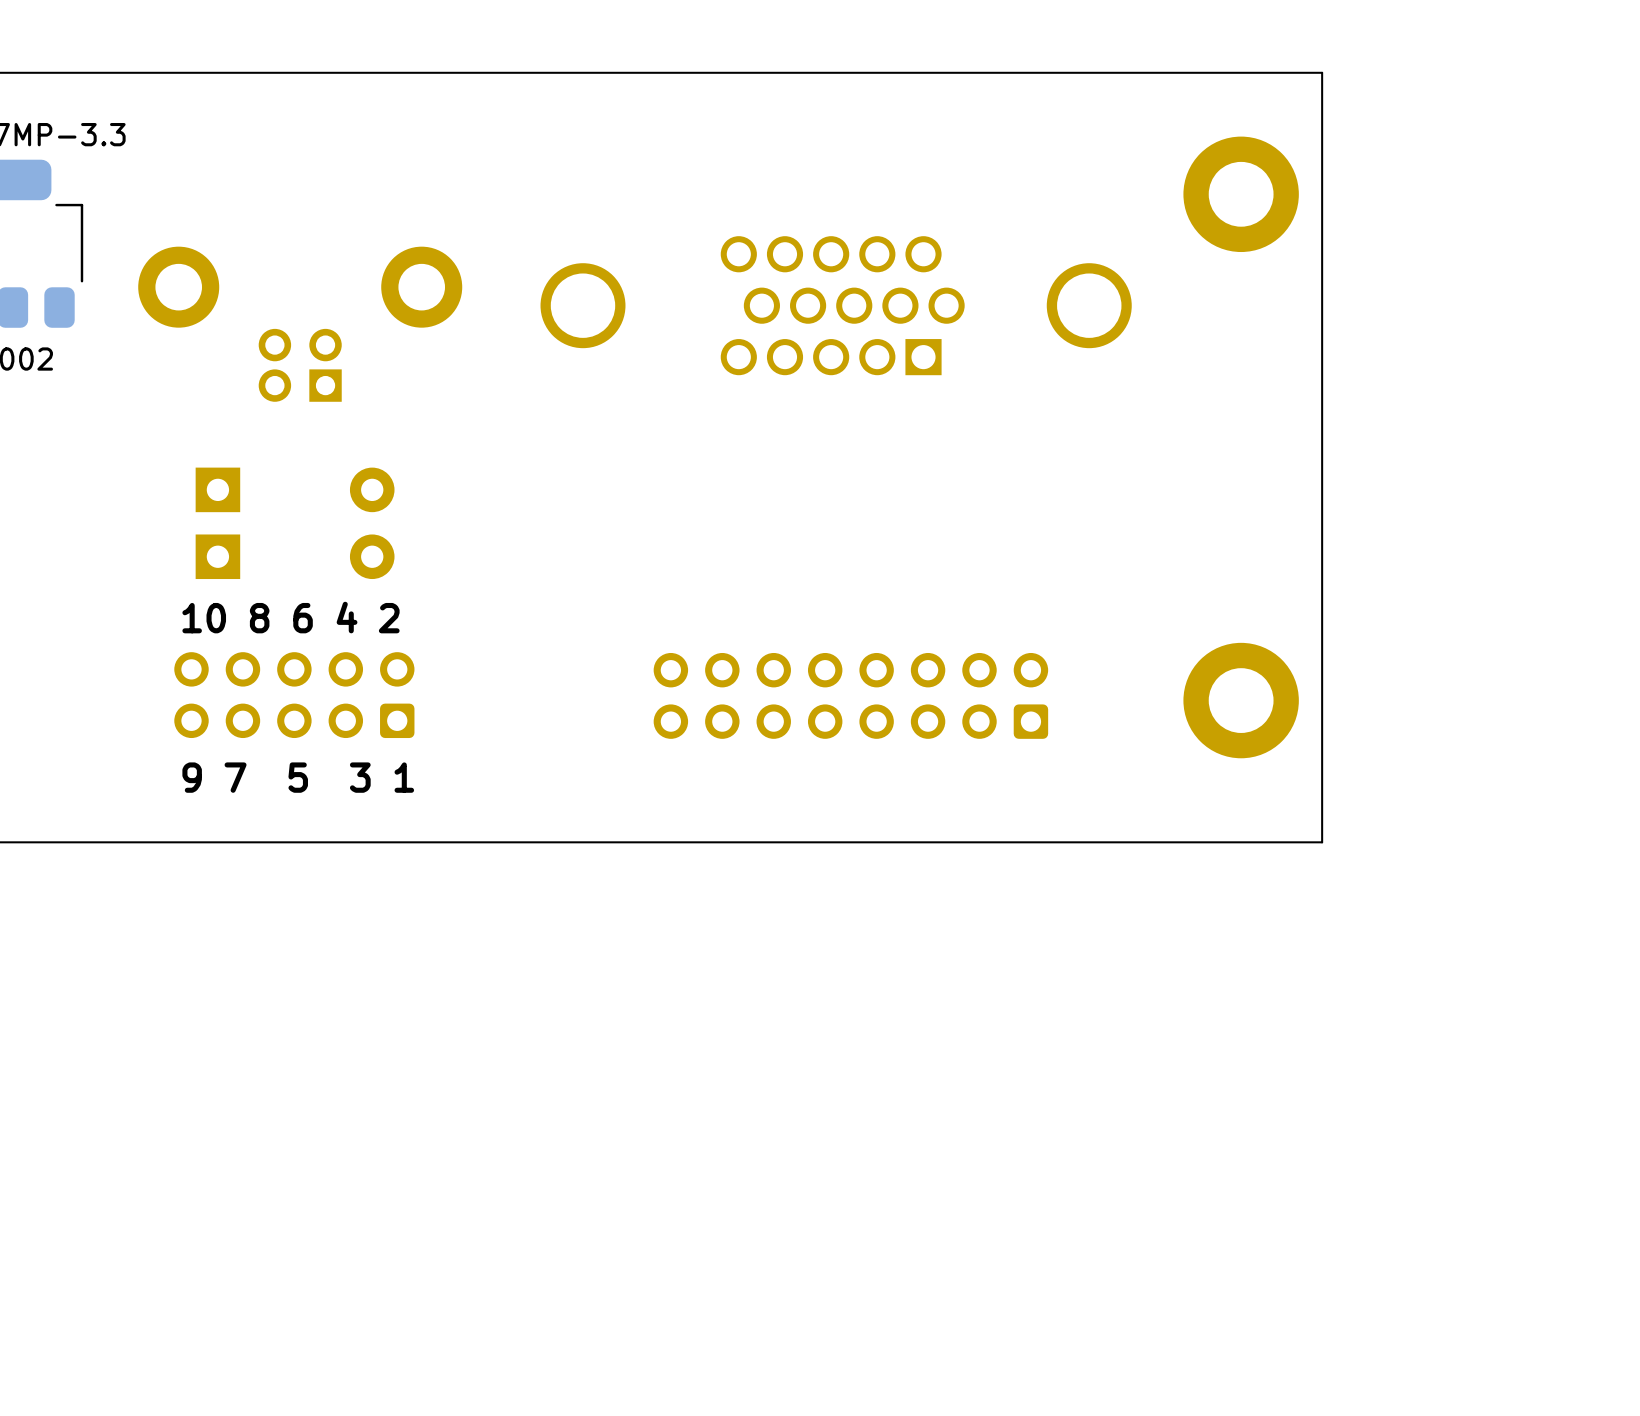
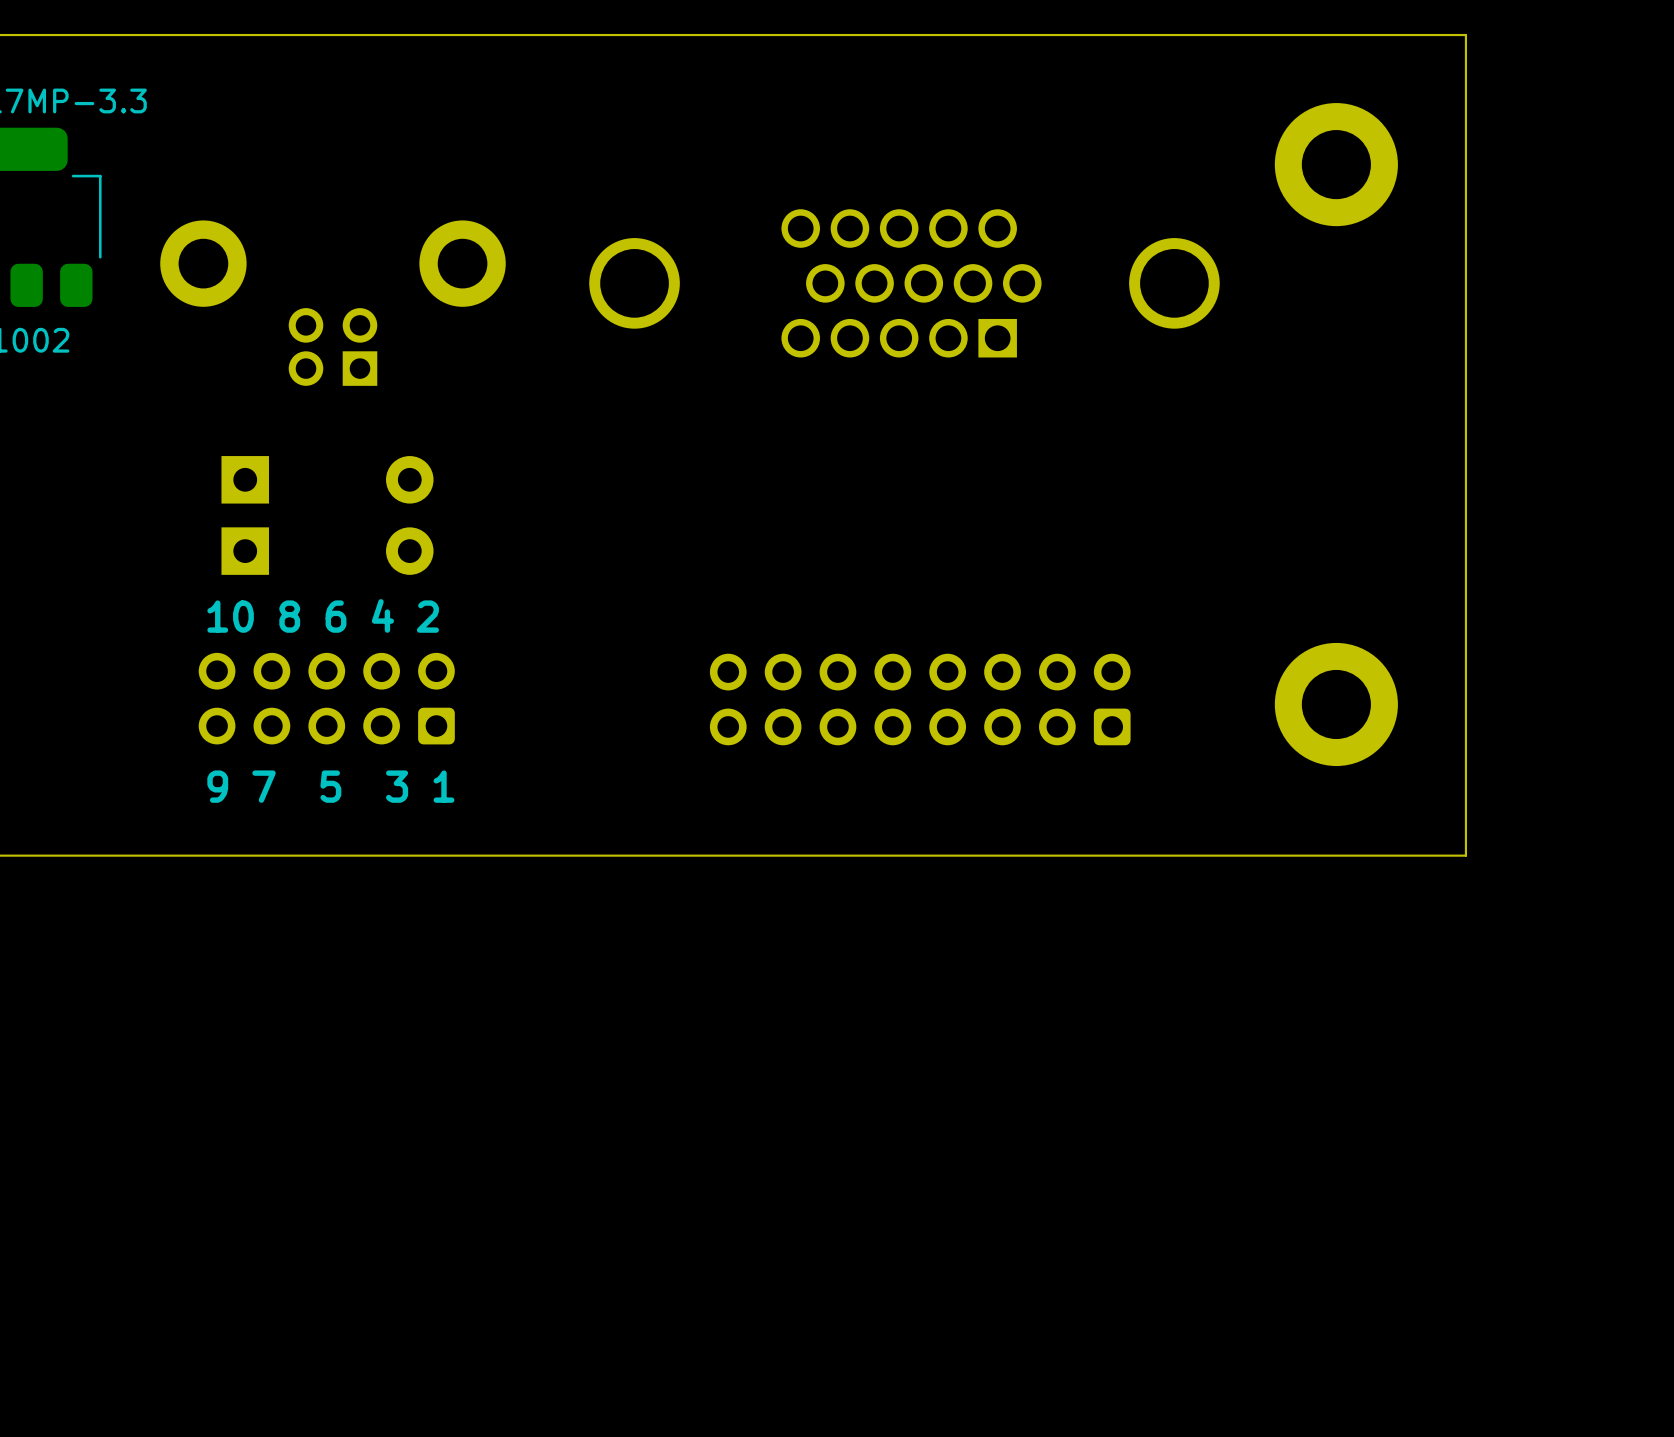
board edge: (1322, 72) (1322, 842) -> (1422, 35) (1465, 35) (1465, 855) (1422, 855)

